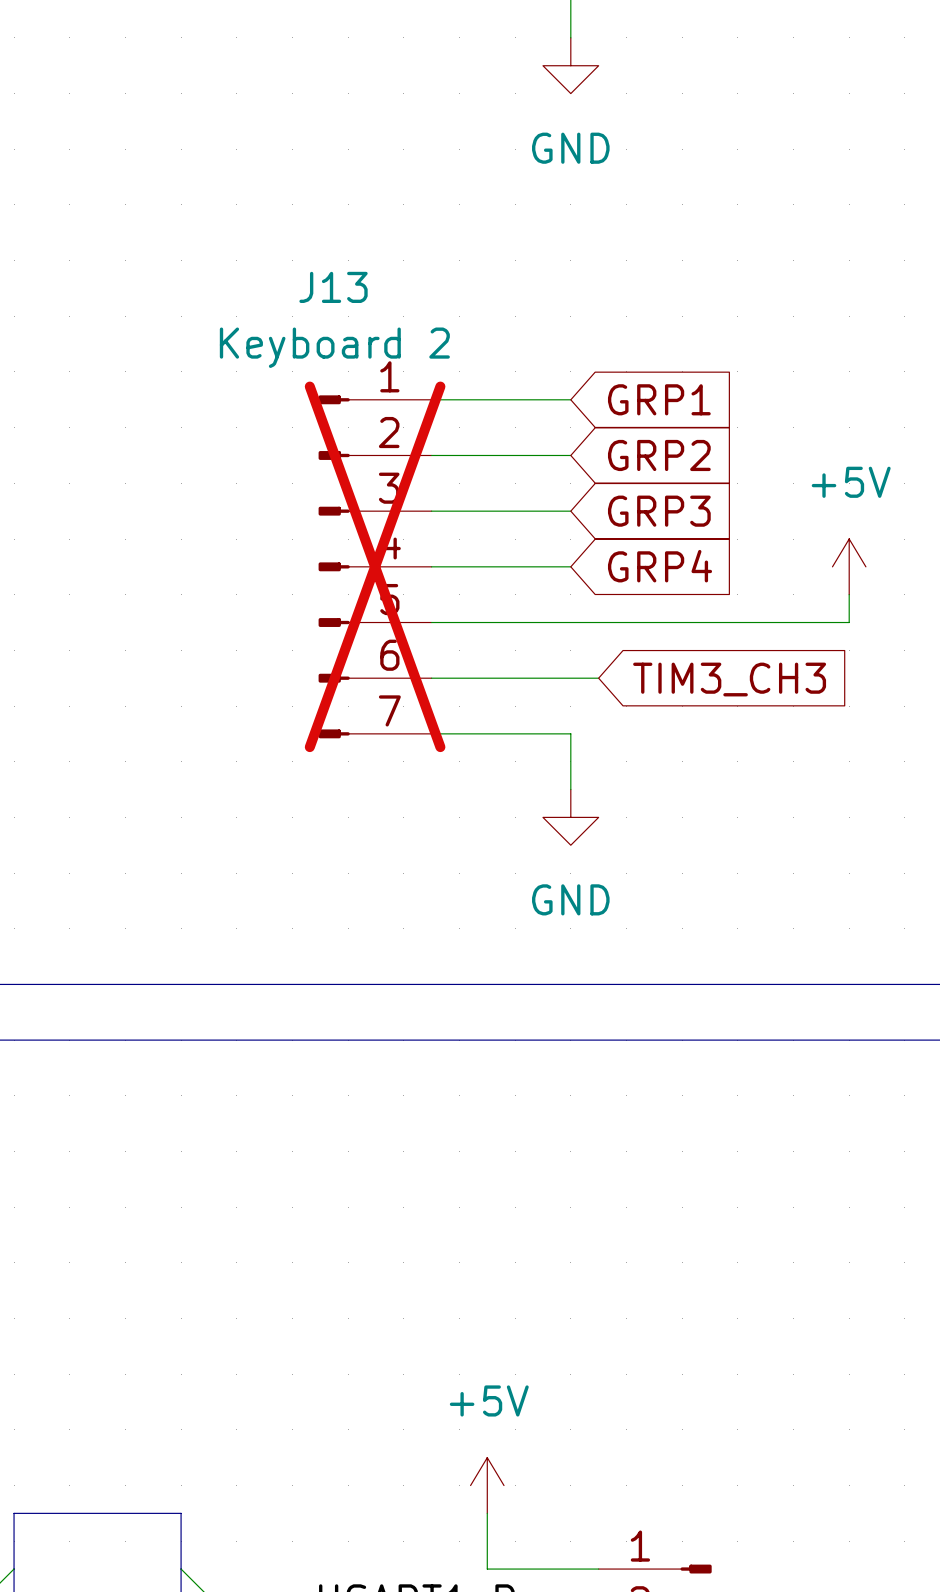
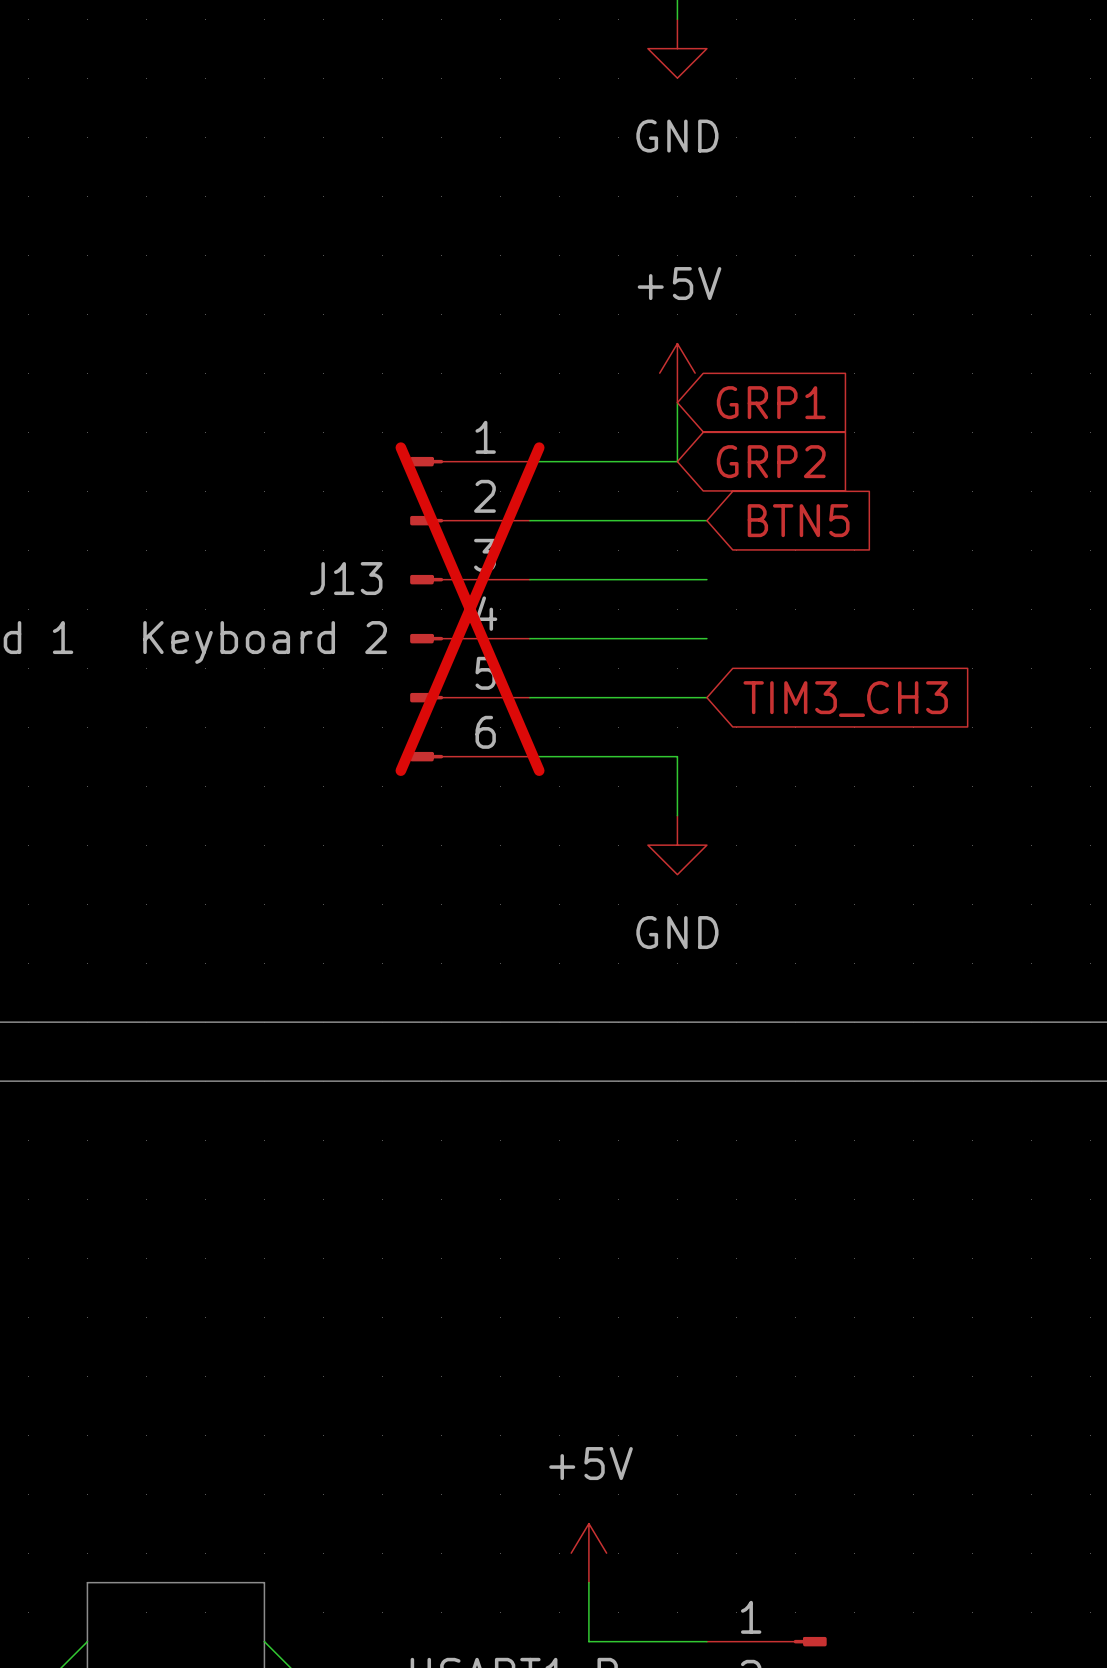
J13 name position: J13 (333, 287) -> J13 (346, 578)
J13 value position: Keyboard 2 (334, 347) -> Keyboard 2 (265, 642)
power symbol: none -> +5V (677, 373)
J13 symbol: [318, 395, 432, 739] -> [410, 456, 530, 762]
wire: (431, 399) (570, 399) -> (677, 461) (677, 402)
wire: none -> (677, 520) (706, 520)
global label: GRP3 (659, 511) -> none
global label: none -> BTN5 (798, 520)
wire: none -> (677, 579) (706, 579)
global label: GRP4 (660, 566) -> none
power symbol: +5V (849, 566) -> none
wire: (849, 594) (849, 622) (598, 622) -> none

